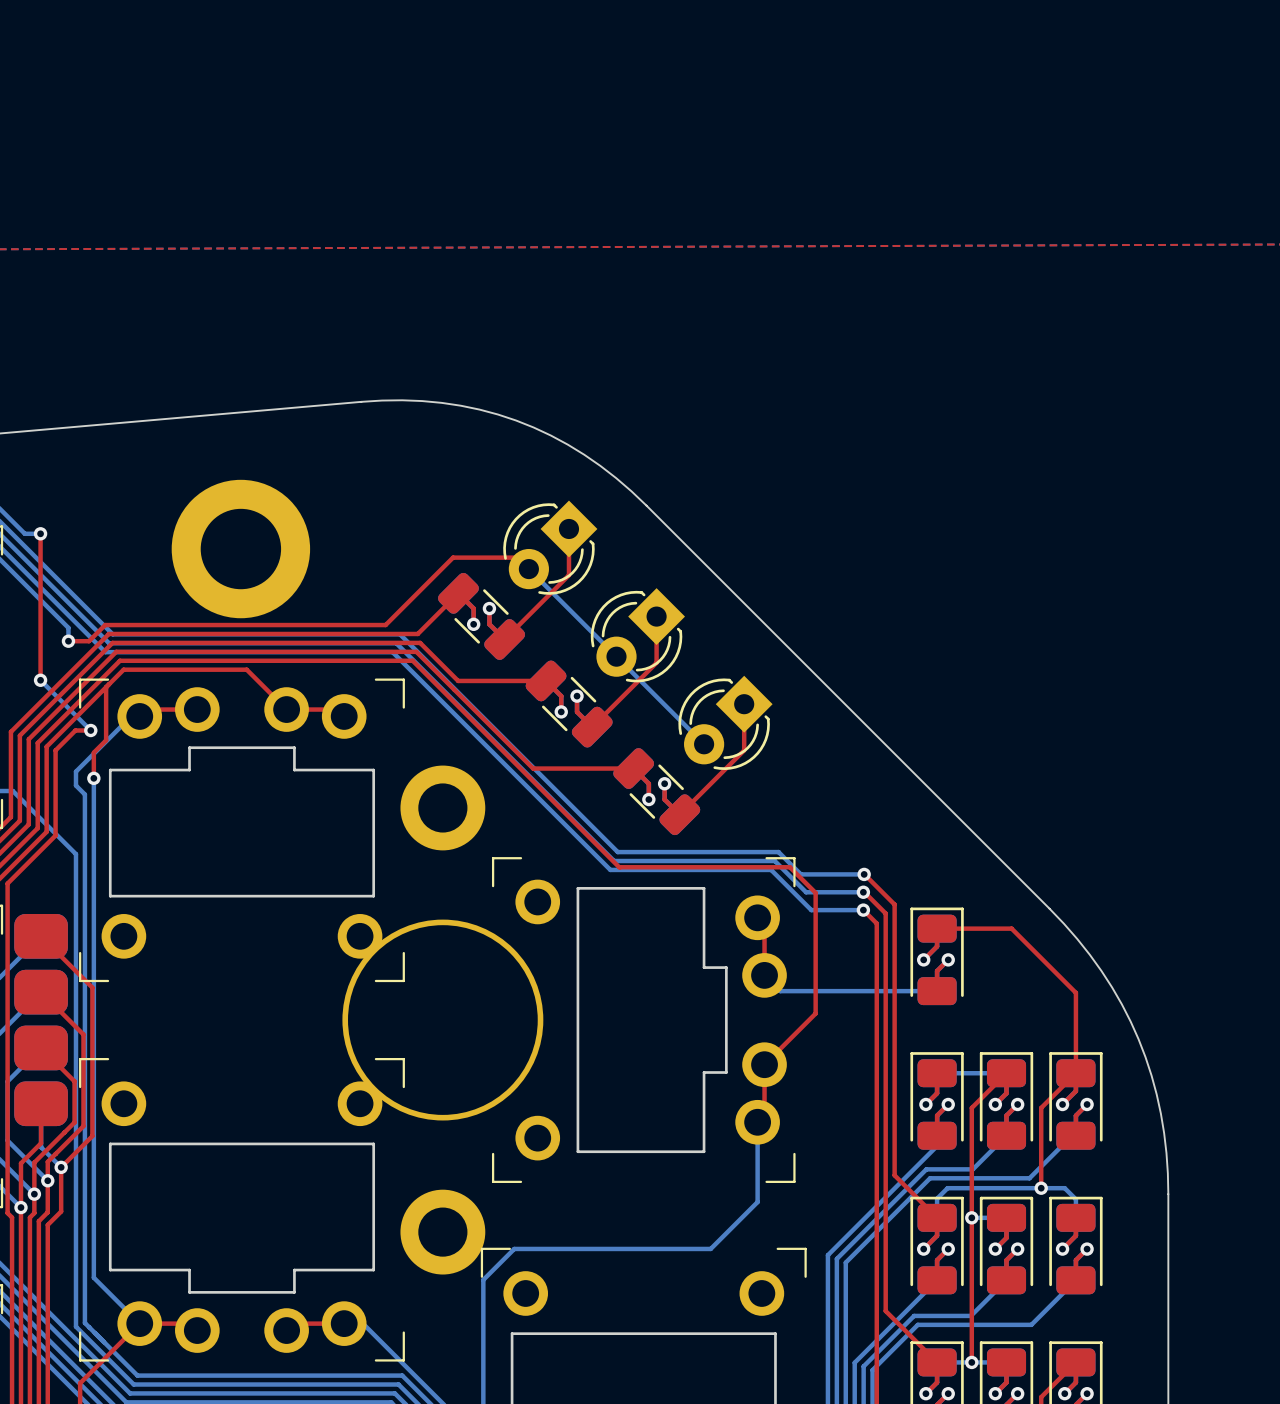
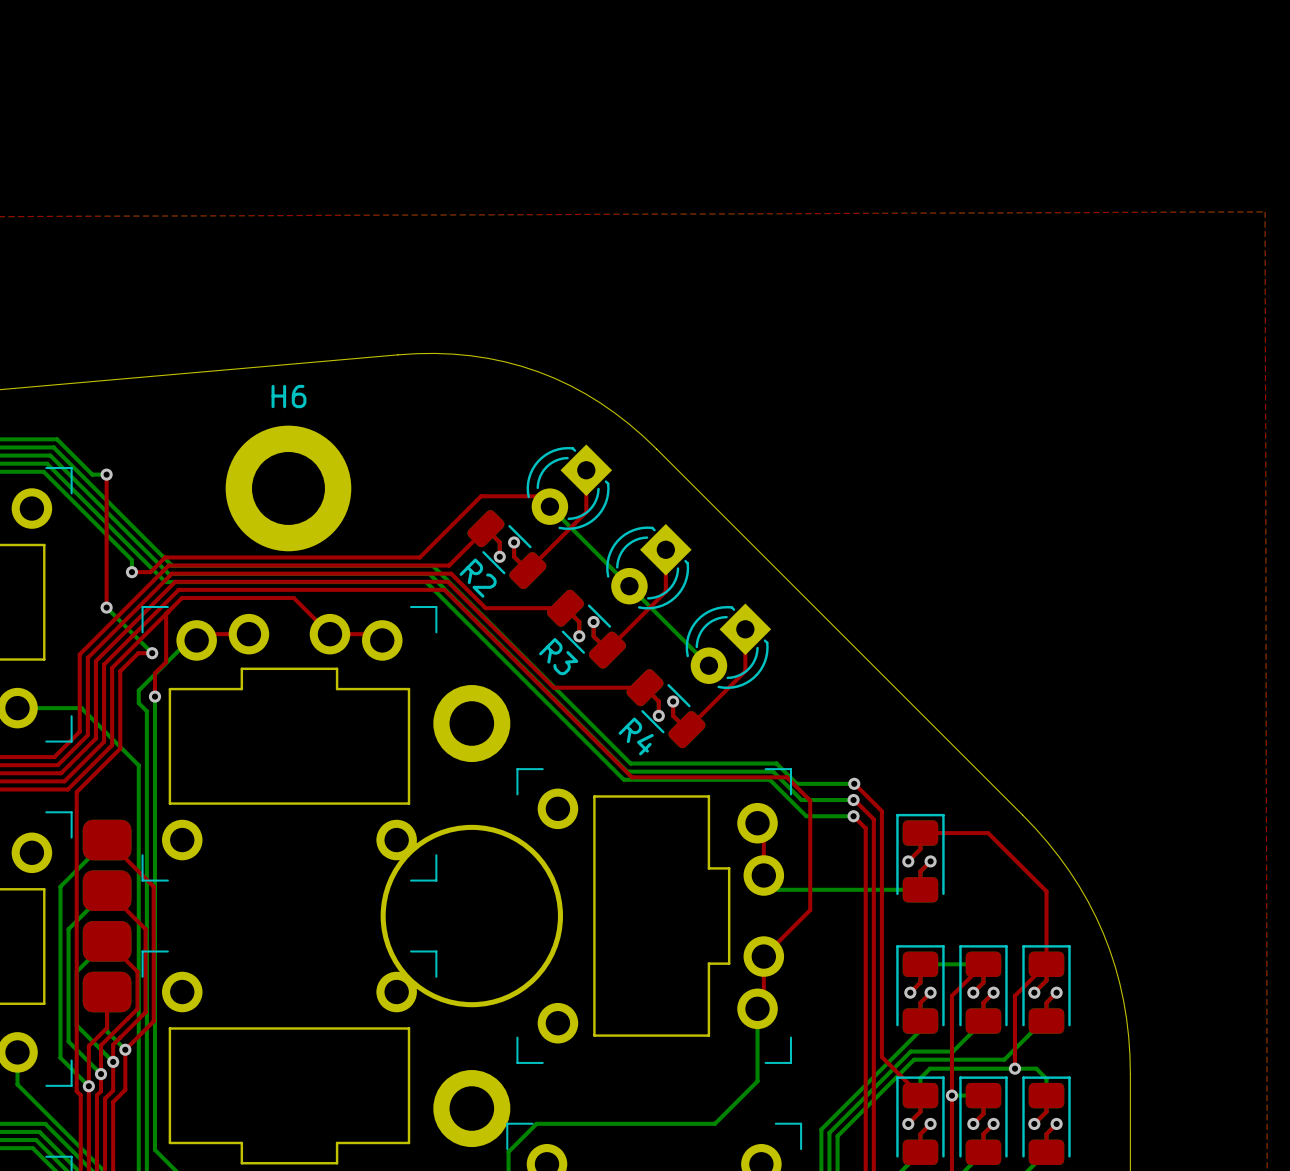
H6 name: none -> H6 (288, 396)
R2 name: none -> R2 (478, 578)
R3 name: none -> R3 (558, 656)
R4 name: none -> R4 (636, 736)

